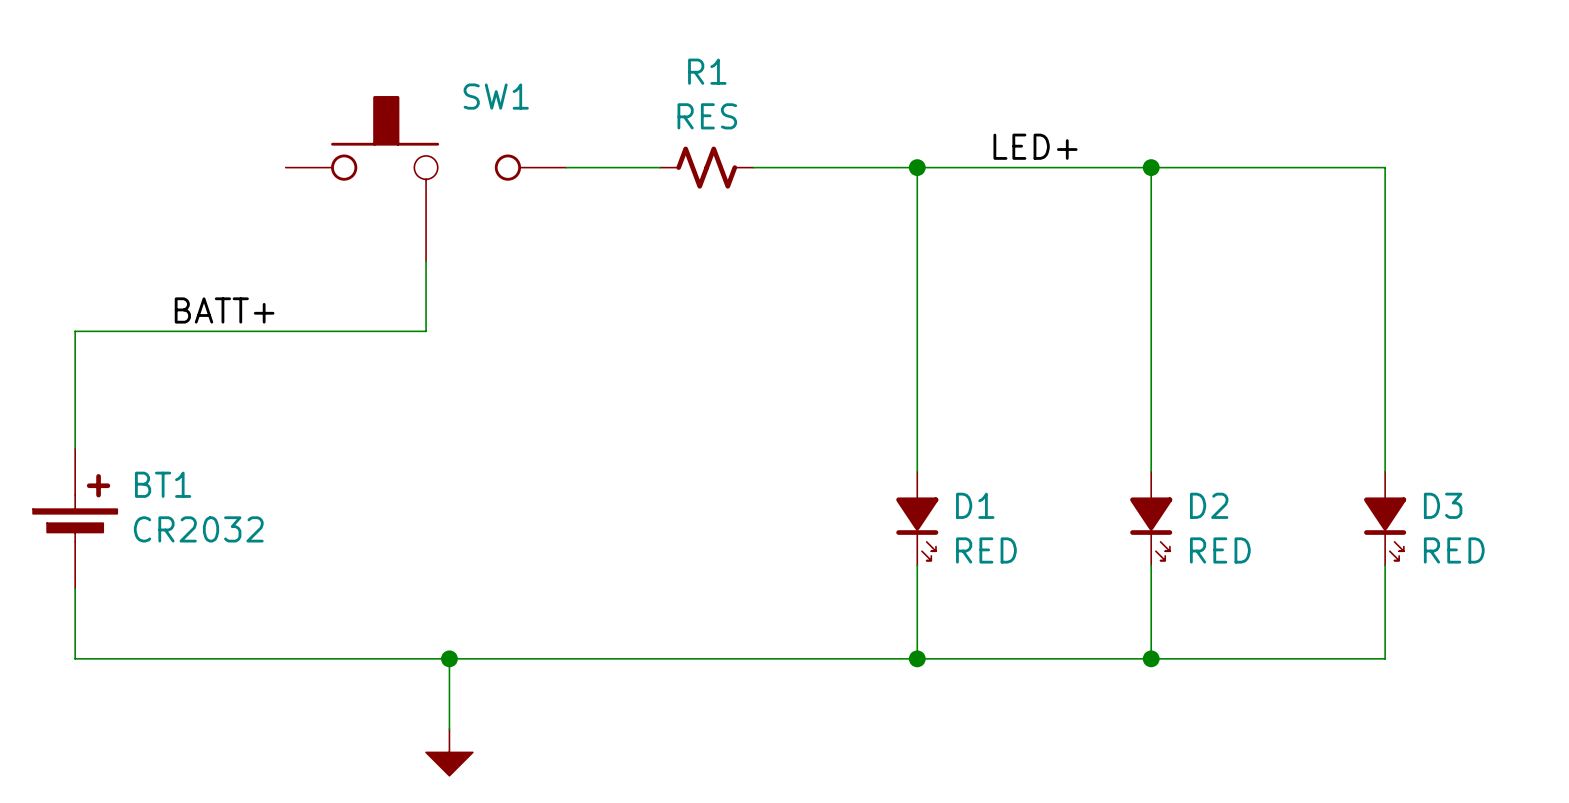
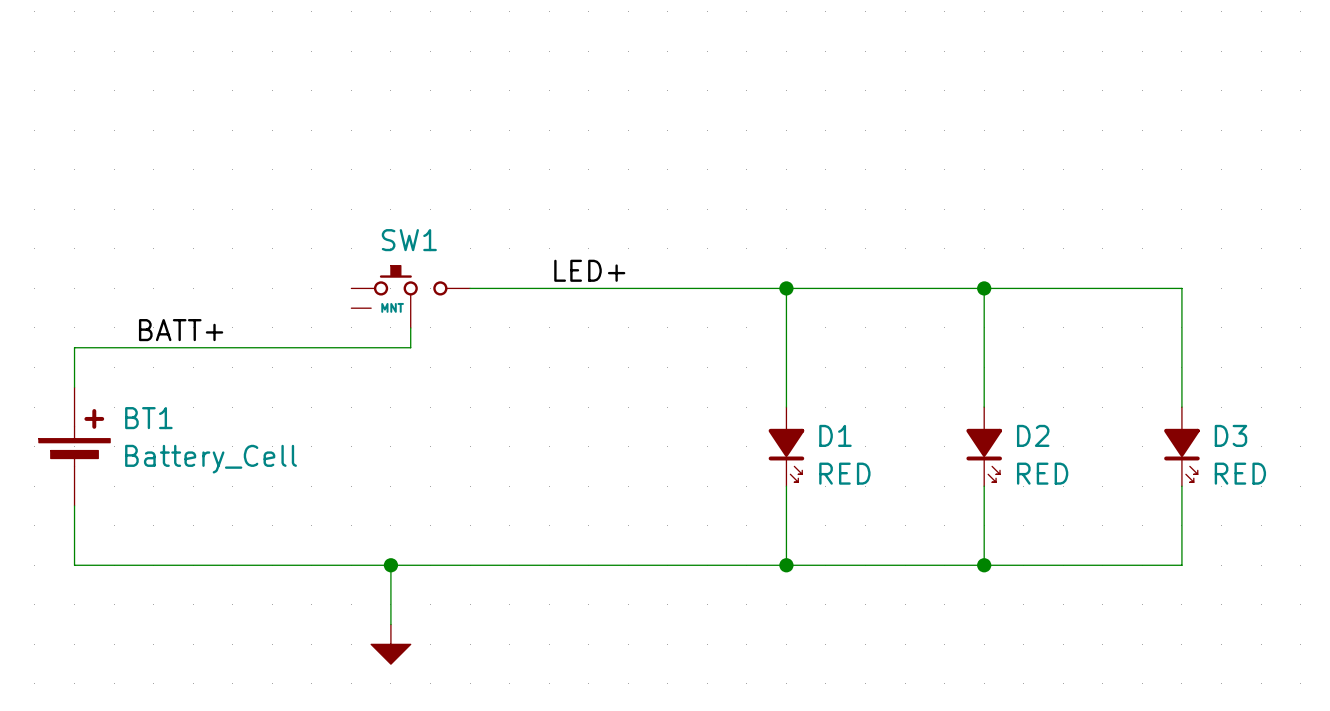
SW1 symbol: [285, 96, 567, 262] -> [351, 265, 471, 328]
SW1 name position: SW1 (496, 96) -> SW1 (409, 240)
label position: LED+ (1035, 146) -> LED+ (589, 270)
wire: (566, 167) (659, 167) -> none
R1: RES (706, 167) -> none
wire: (753, 167) (1385, 167) (1385, 331) -> (470, 288) (1181, 288)
wire: (917, 167) (917, 331) -> none
junction: (917, 167) -> none
wire: (1151, 167) (1151, 331) -> none
junction: (1151, 167) -> none
wire: (426, 261) (426, 331) (75, 331) (75, 401) -> (410, 327) (410, 347) (74, 347)
label position: BATT+ (224, 310) -> BATT+ (181, 330)
junction: none -> (786, 288)
junction: none -> (984, 288)
BT1 value: CR2032 (198, 529) -> Battery_Cell (211, 459)

